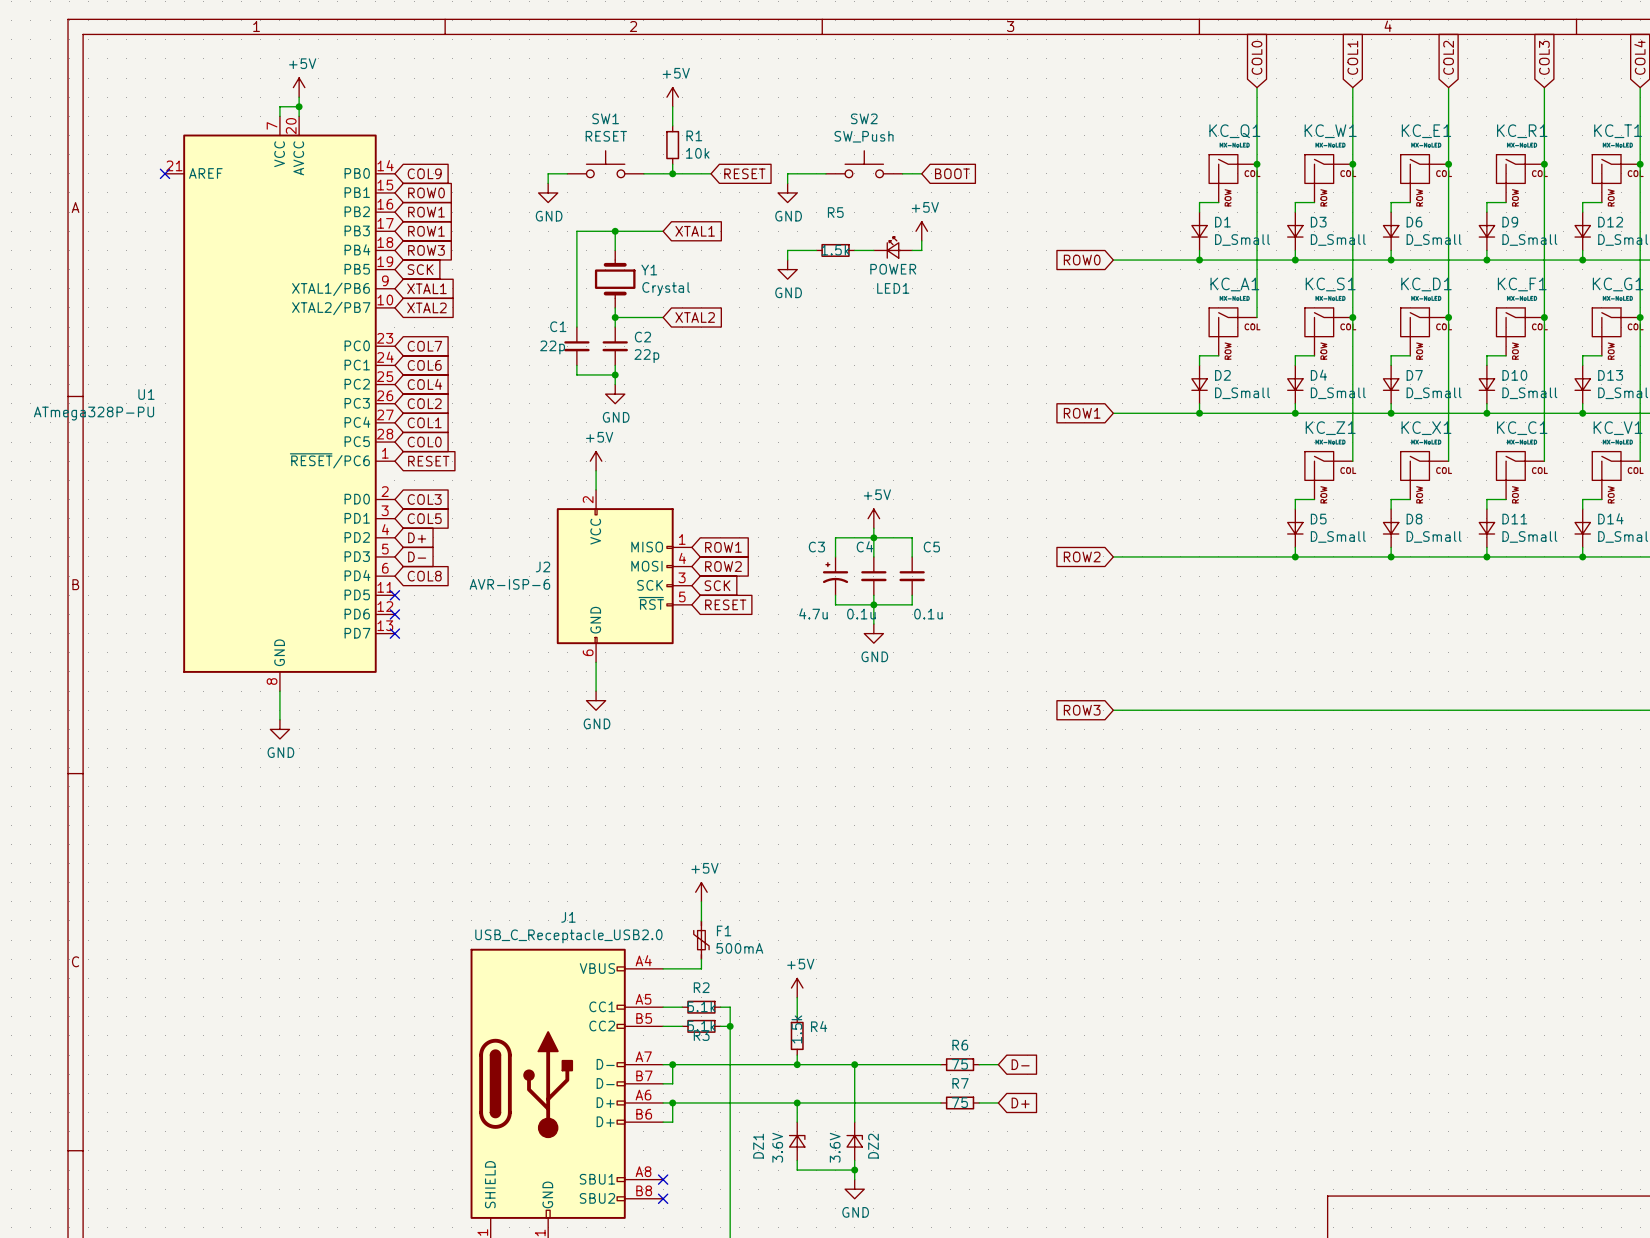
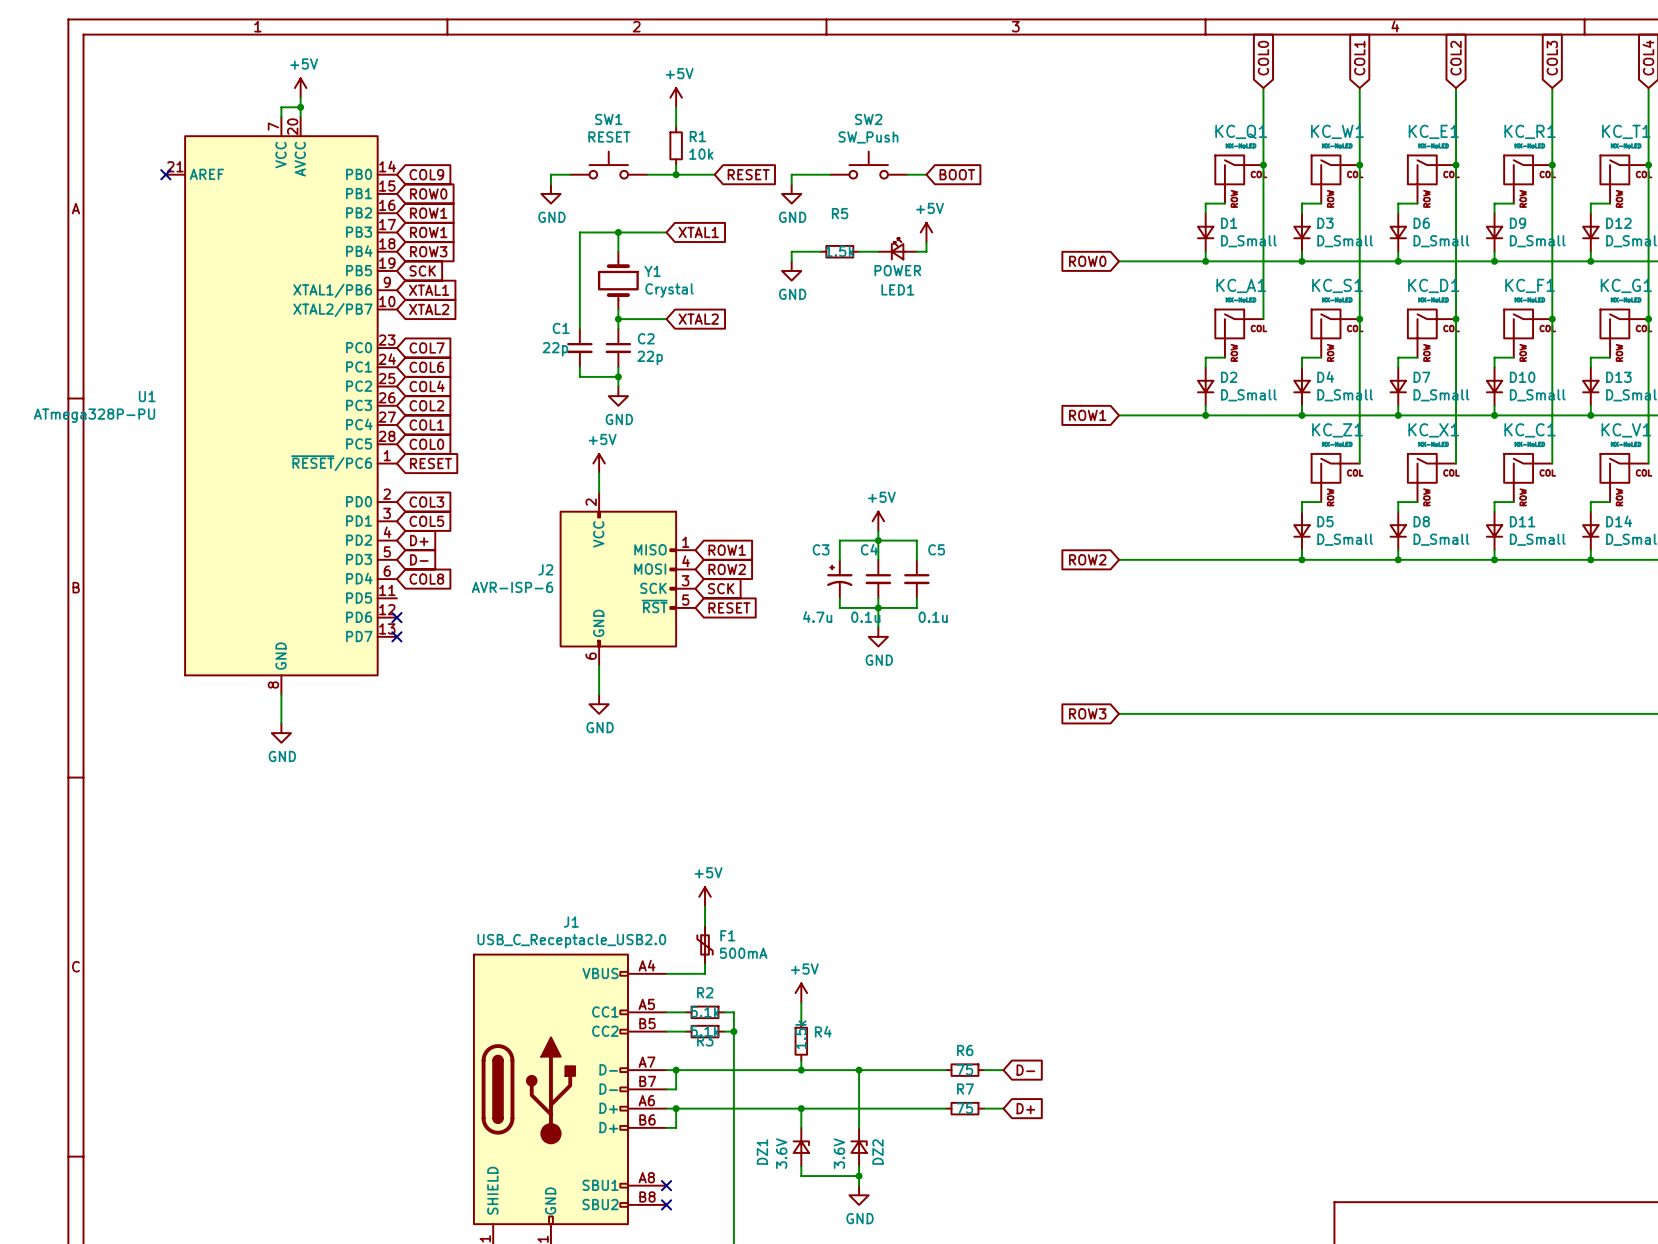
no-connect mark: (394, 595) -> none

